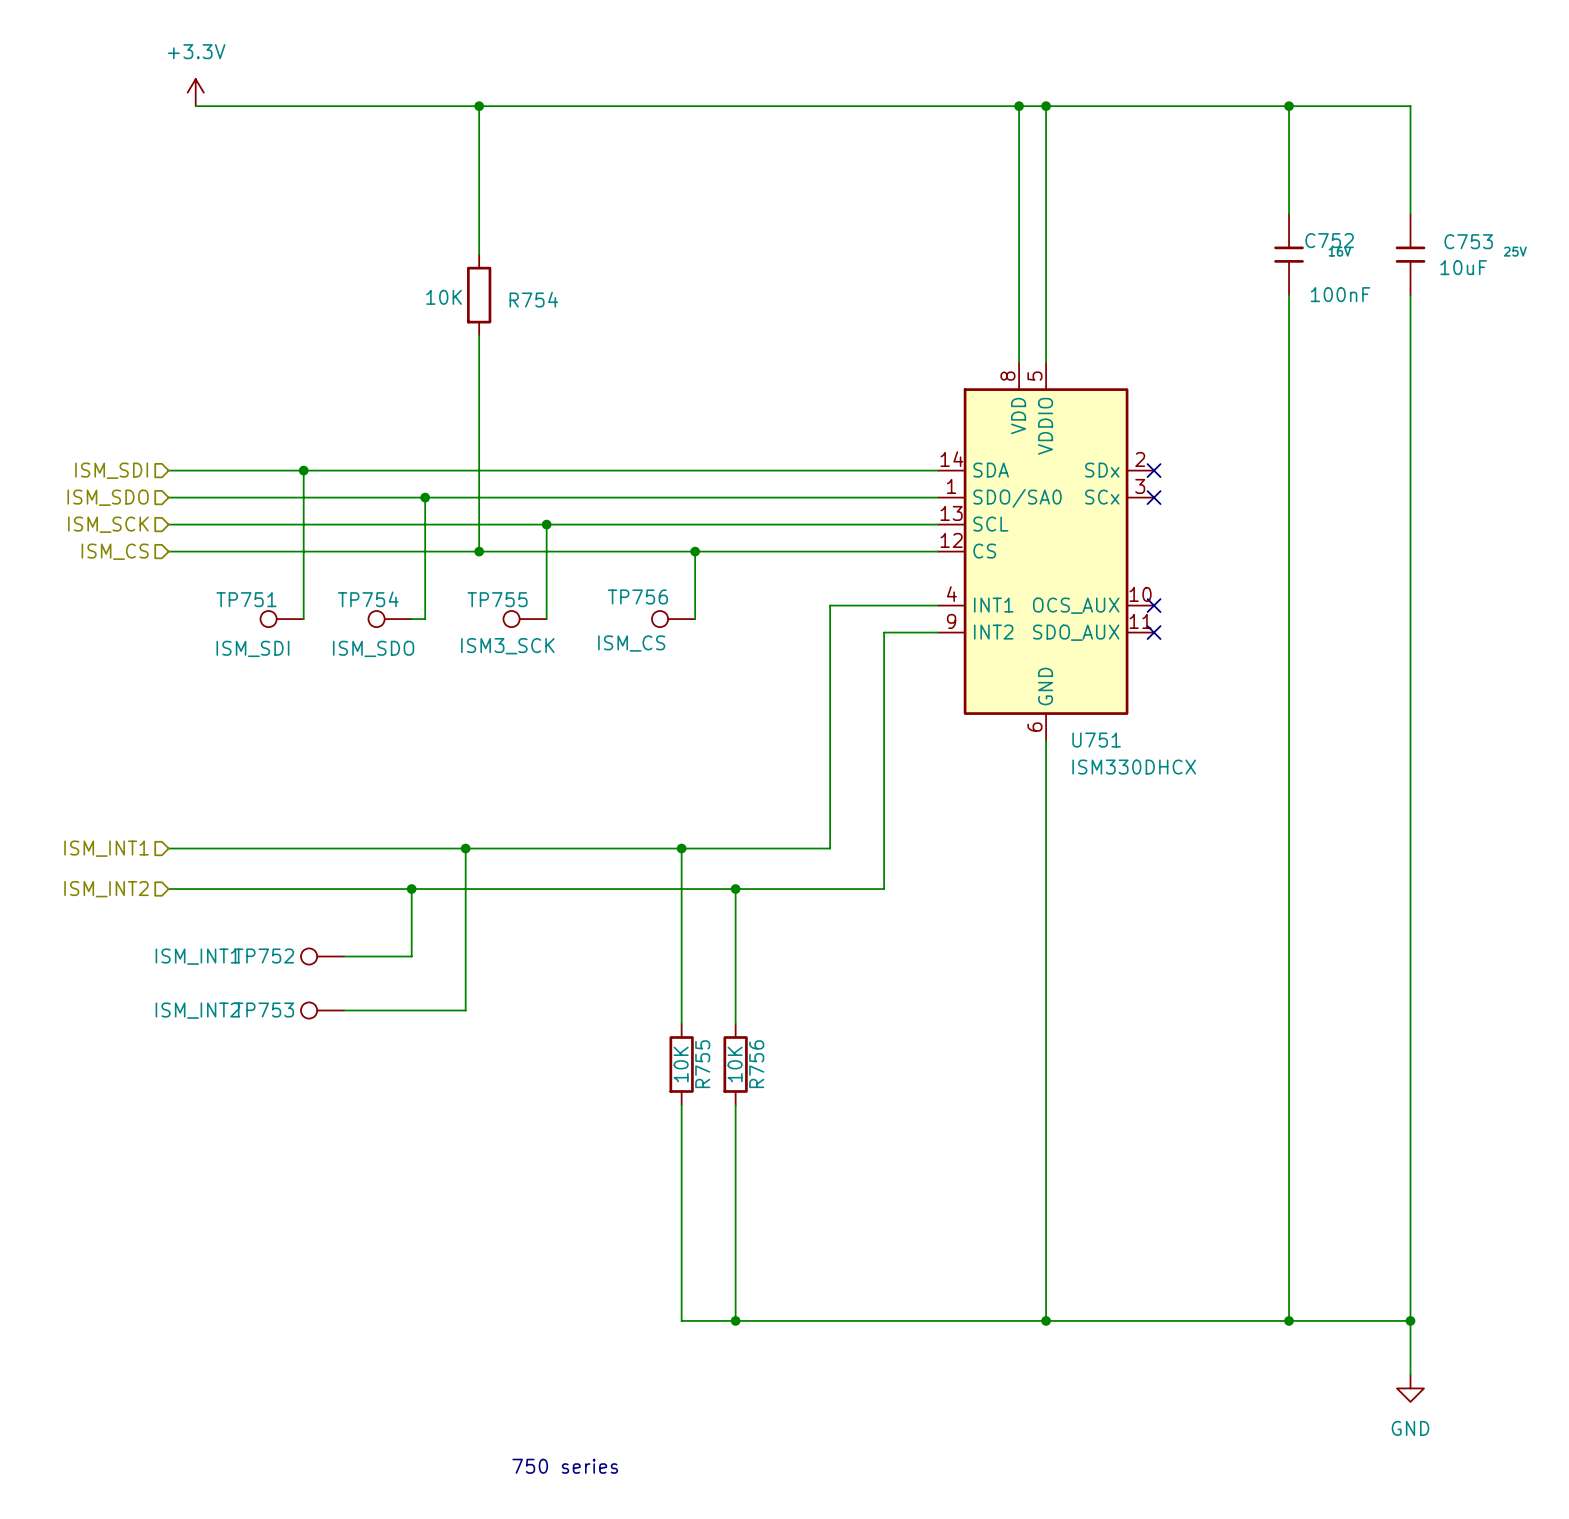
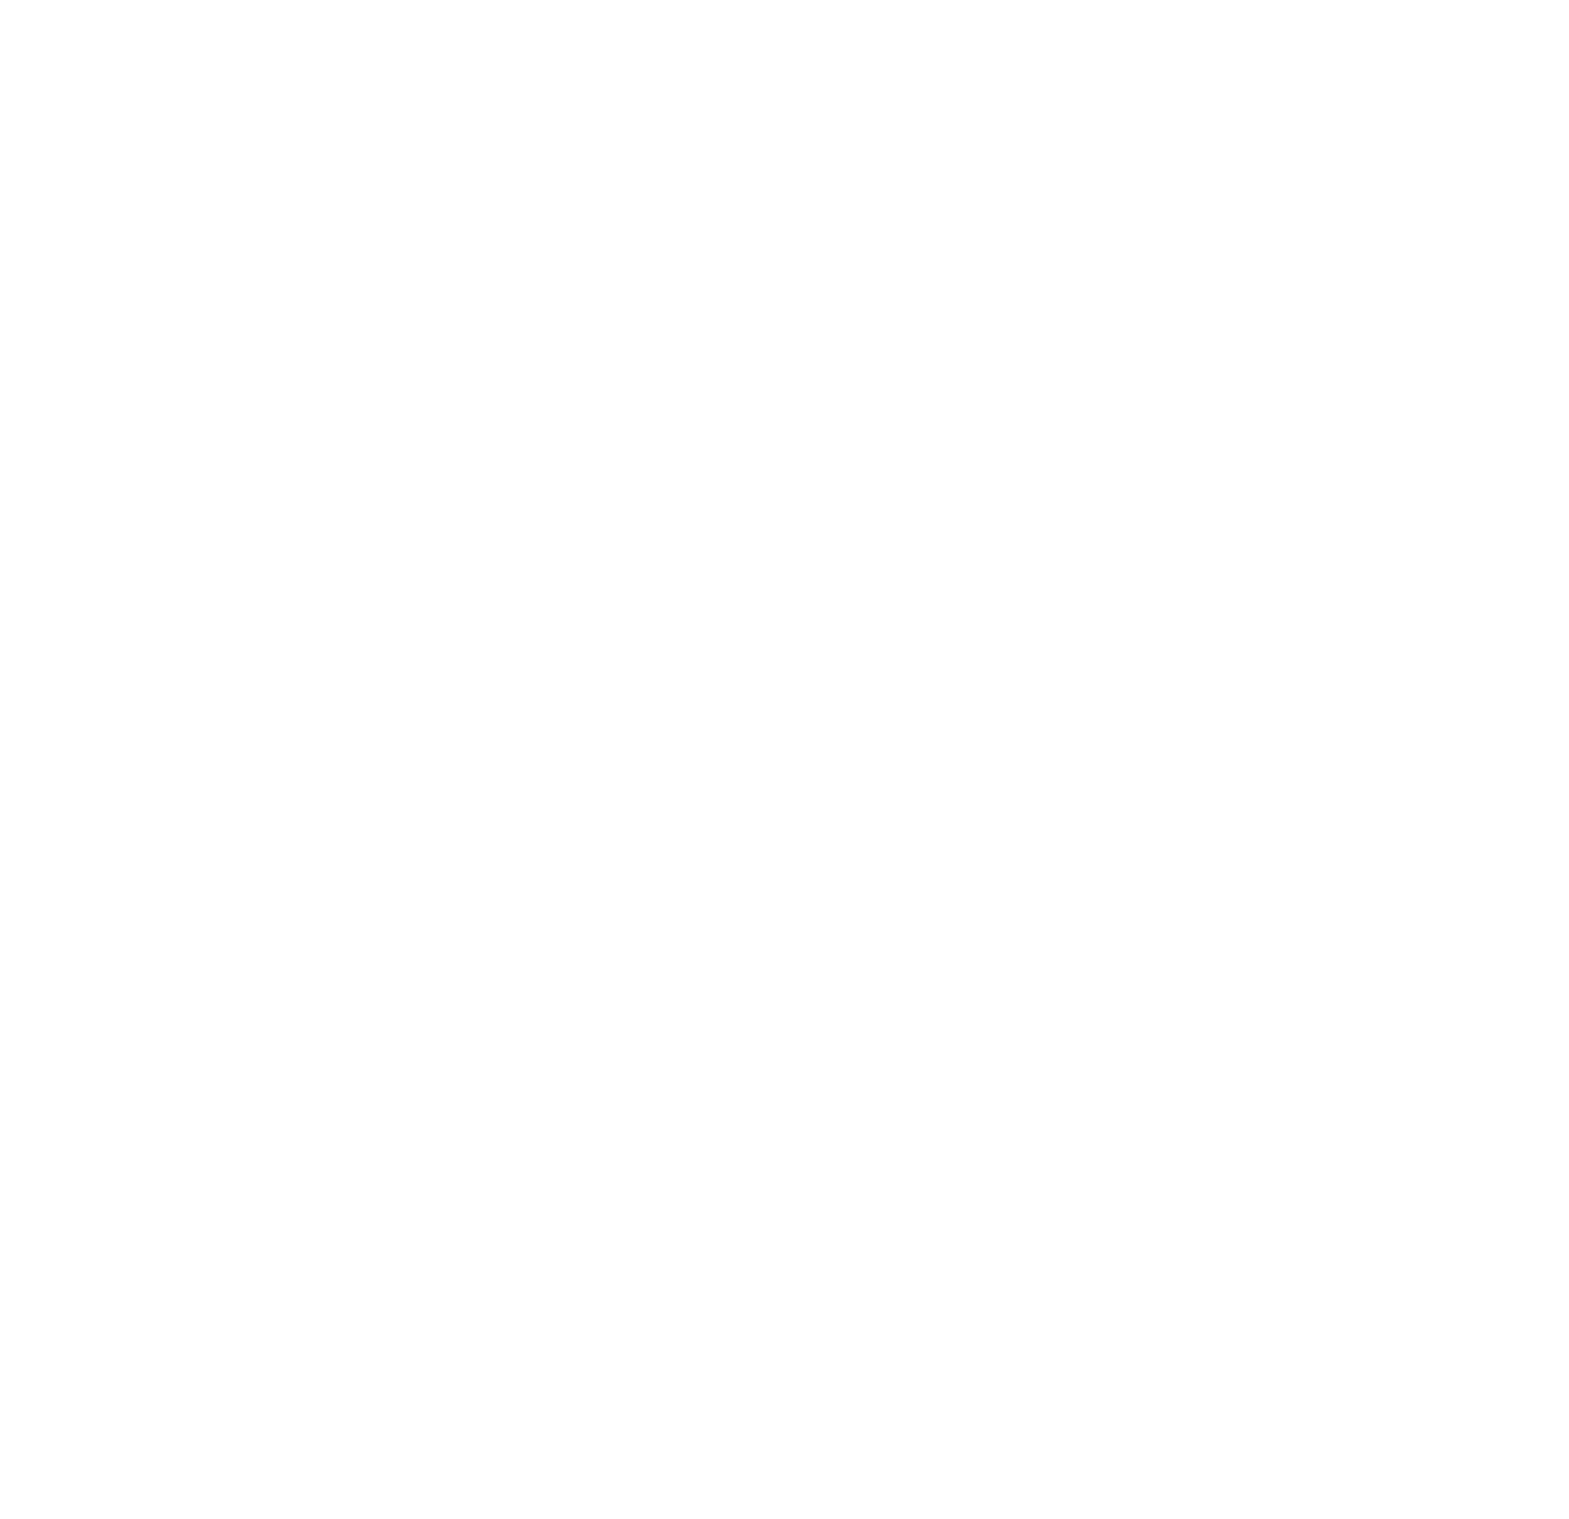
power symbol: +3.3V (195, 92) -> none
wire: (195, 106) (1410, 106) (1410, 214) -> none
wire: (479, 106) (479, 254) -> none
junction: (479, 106) -> none
wire: (1019, 106) (1019, 362) -> none
junction: (1019, 106) -> none
wire: (1046, 106) (1046, 362) -> none
junction: (1046, 106) -> none
wire: (1289, 106) (1289, 214) -> none
junction: (1289, 106) -> none
C752: 100nF (1289, 254) -> none
C753: 10uF (1410, 254) -> none
R754: 10K (479, 295) -> none
wire: (1289, 295) (1289, 1320) -> none
wire: (1410, 295) (1410, 1374) -> none
wire: (479, 335) (479, 551) -> none
hierarchical label: ISM_SDI (111, 470) -> none
wire: (168, 470) (938, 470) -> none
wire: (303, 470) (303, 619) -> none
junction: (303, 470) -> none
no-connect mark: (1154, 470) -> none
hierarchical label: ISM_SDO (108, 497) -> none
wire: (168, 497) (938, 497) -> none
wire: (425, 497) (425, 619) (411, 619) -> none
junction: (425, 497) -> none
no-connect mark: (1154, 497) -> none
hierarchical label: ISM_SCK (108, 524) -> none
wire: (168, 524) (938, 524) -> none
wire: (546, 524) (546, 619) -> none
junction: (546, 524) -> none
hierarchical label: ISM_CS (115, 551) -> none
wire: (168, 551) (938, 551) -> none
junction: (479, 551) -> none
wire: (695, 551) (695, 619) -> none
junction: (695, 551) -> none
U751: ISM330DHCX (1046, 551) -> none
wire: (938, 605) (830, 605) (830, 848) (168, 848) -> none
no-connect mark: (1154, 605) -> none
TP751: ISM_SDI (282, 619) -> none
TP754: ISM_SDO (390, 619) -> none
TP755: ISM3_SCK (525, 619) -> none
TP756: ISM_CS (673, 619) -> none
wire: (938, 632) (884, 632) (884, 889) (168, 889) -> none
no-connect mark: (1154, 632) -> none
wire: (1046, 740) (1046, 1320) -> none
hierarchical label: ISM_INT1 (106, 848) -> none
wire: (465, 848) (465, 1010) (344, 1010) -> none
junction: (465, 848) -> none
wire: (681, 848) (681, 1024) -> none
junction: (681, 848) -> none
hierarchical label: ISM_INT2 (106, 889) -> none
wire: (411, 889) (411, 956) (344, 956) -> none
junction: (411, 889) -> none
wire: (735, 889) (735, 1024) -> none
junction: (735, 889) -> none
TP752: ISM_INT1 (322, 956) -> none
TP753: ISM_INT2 (322, 1010) -> none
R755: 10K (681, 1064) -> none
R756: 10K (735, 1064) -> none
wire: (681, 1104) (681, 1320) (1410, 1320) -> none
wire: (735, 1104) (735, 1320) -> none
junction: (735, 1320) -> none
junction: (1046, 1320) -> none
junction: (1289, 1320) -> none
junction: (1410, 1320) -> none
power symbol: GND (1410, 1388) -> none
text: 750 series (565, 1466) -> none

